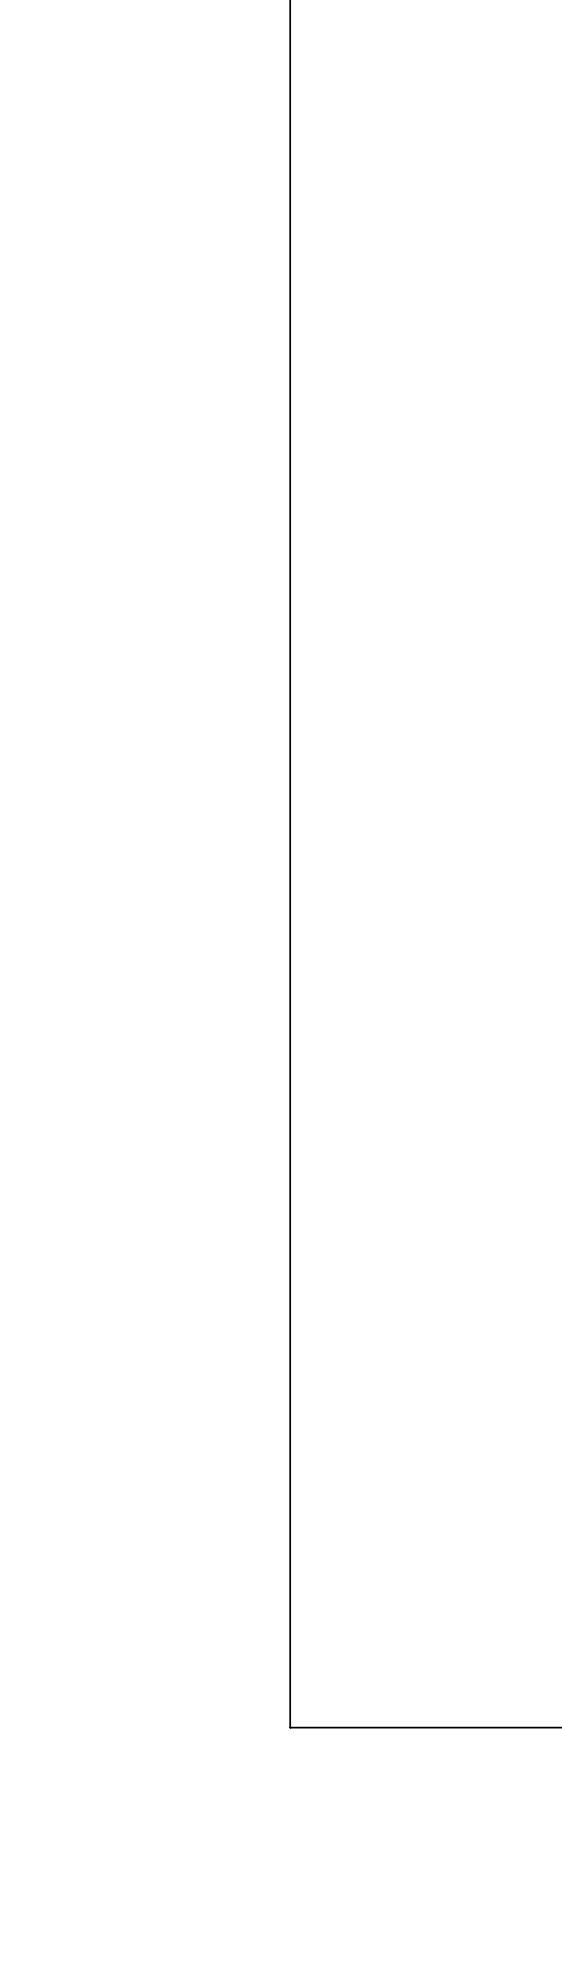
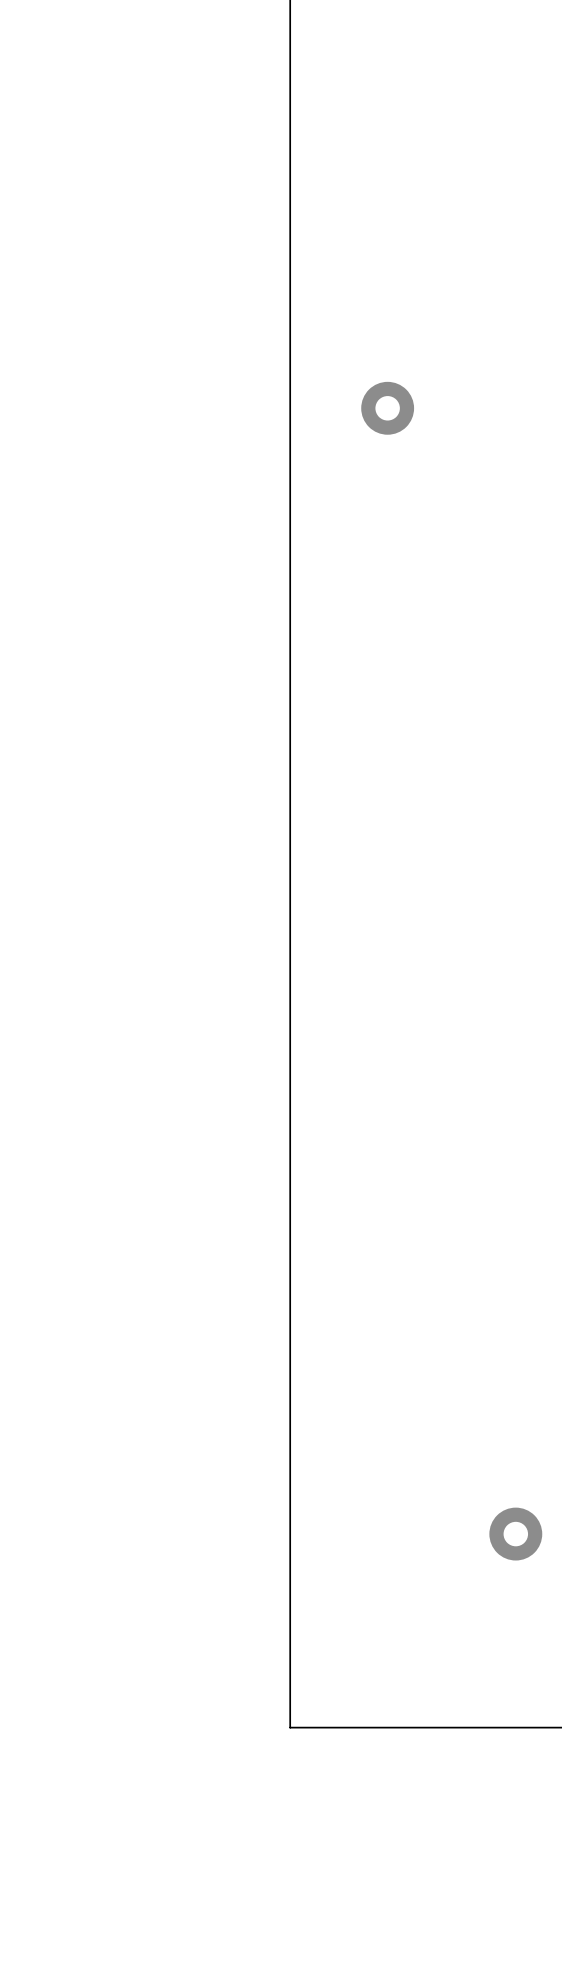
via: none -> (387, 408)
via: none -> (515, 1534)

